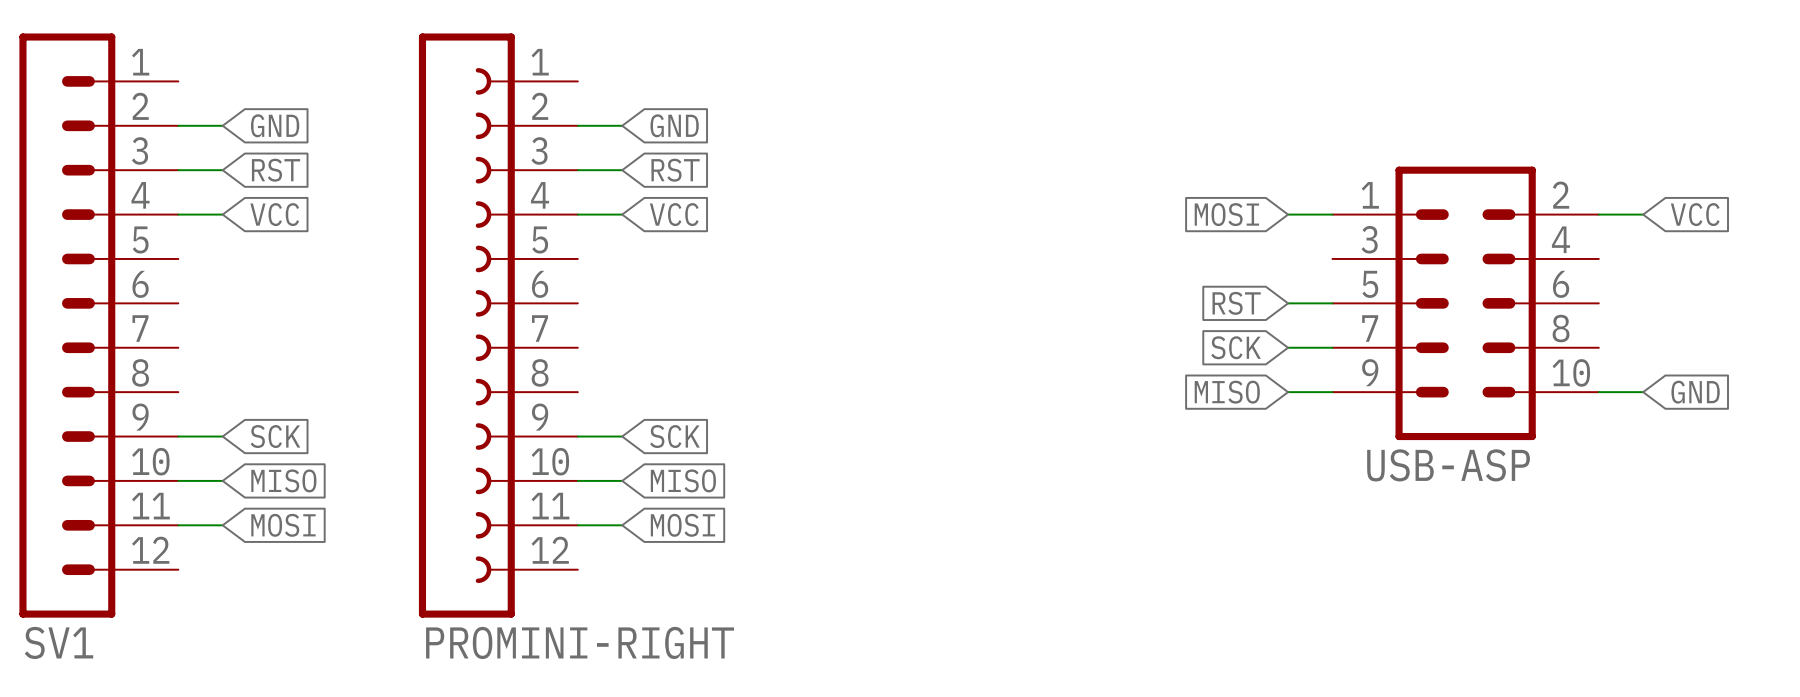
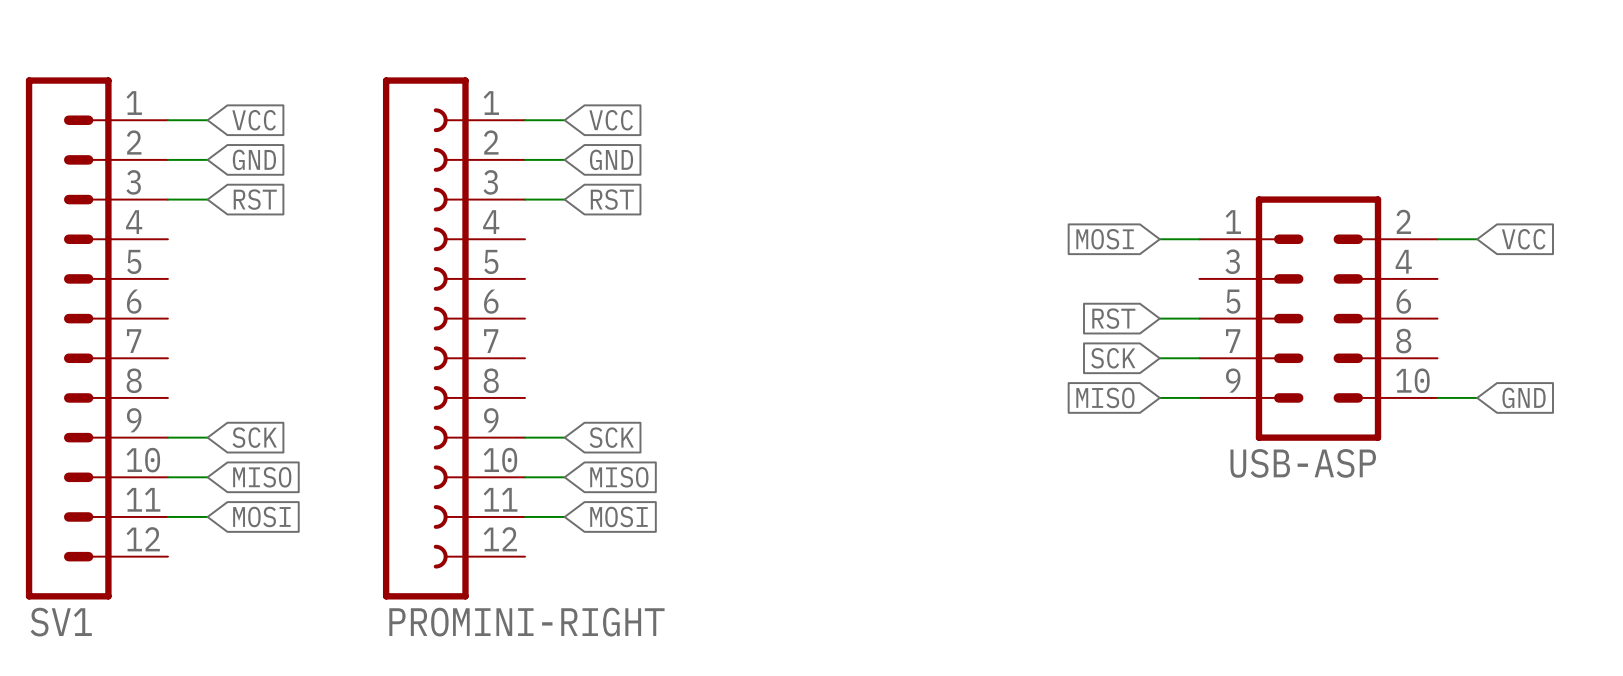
wire: (178, 214) (222, 214) -> (167, 120) (207, 120)
global label position: VCC (274, 214) -> VCC (254, 120)
wire: (577, 214) (622, 214) -> (525, 120) (564, 120)
global label position: VCC (674, 214) -> VCC (611, 120)

